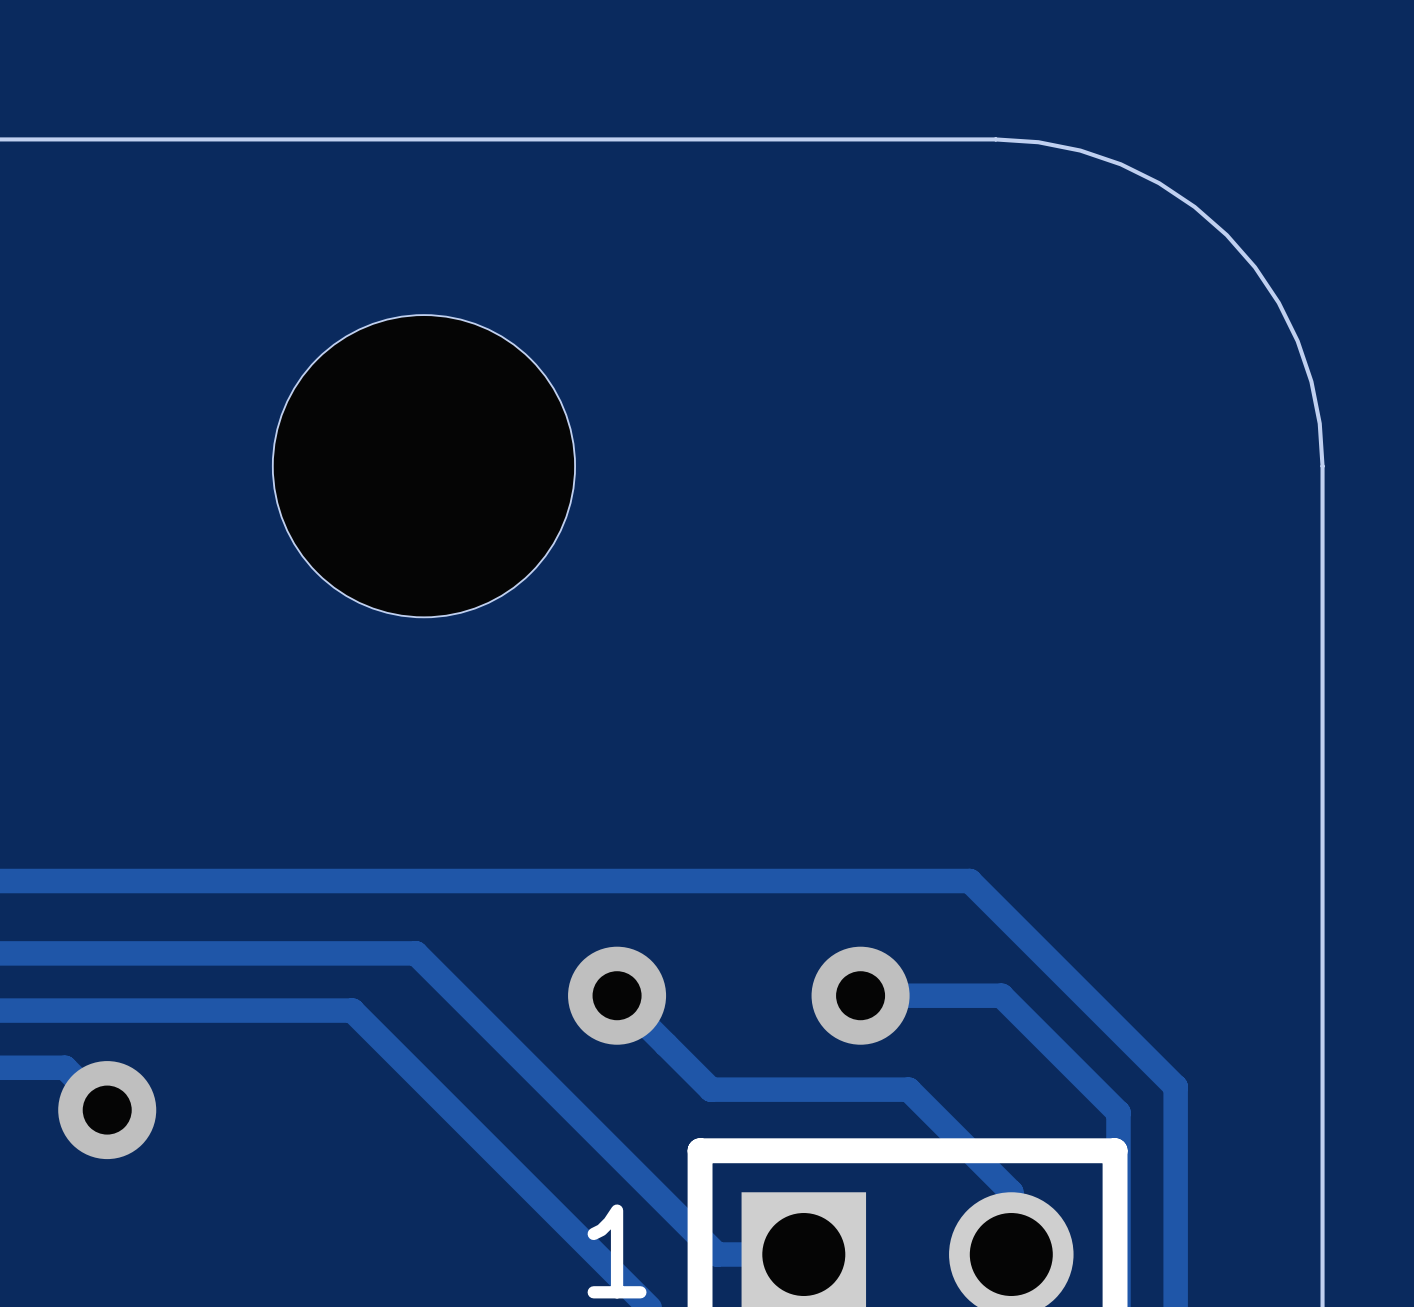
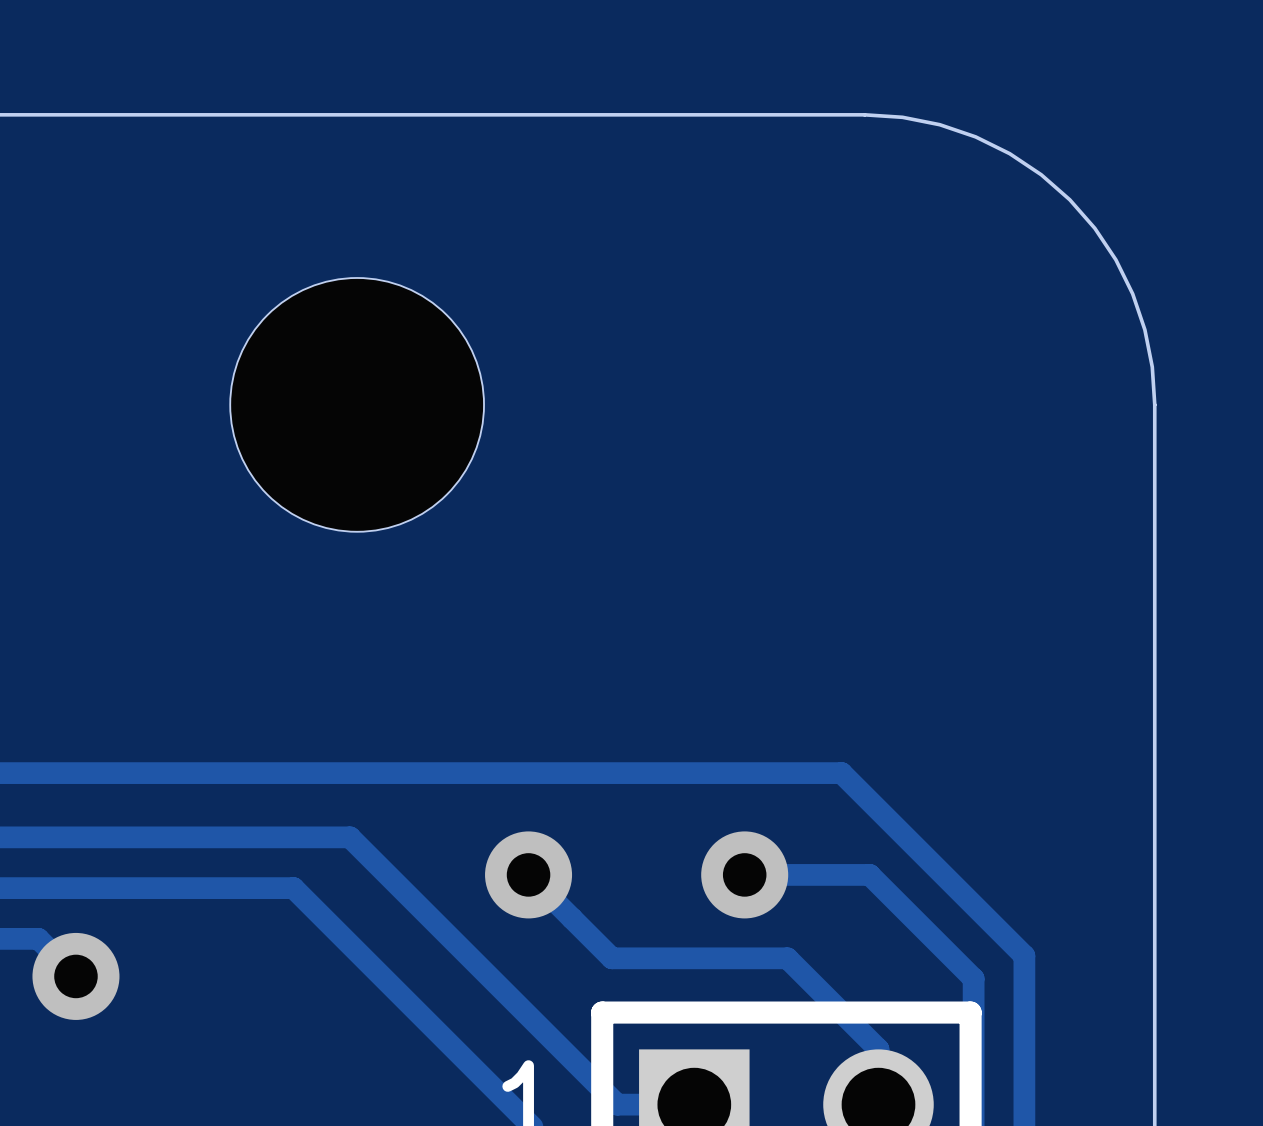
part footprint: [272, 315, 576, 618] -> [230, 277, 485, 532]

